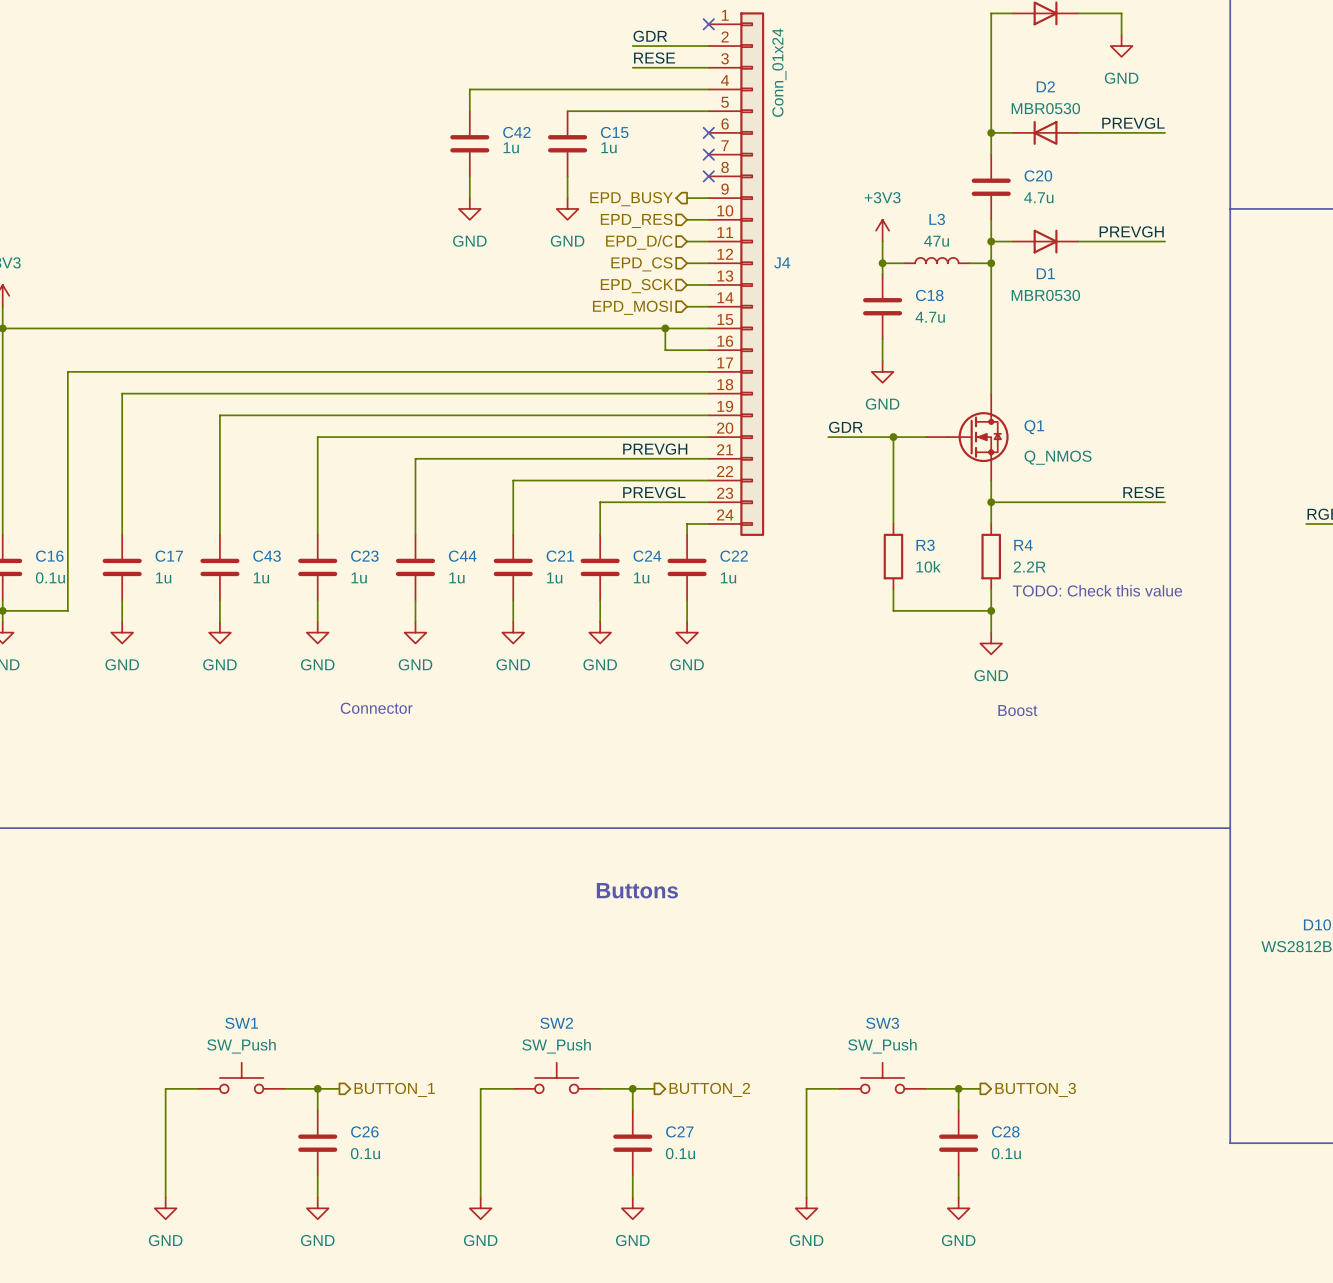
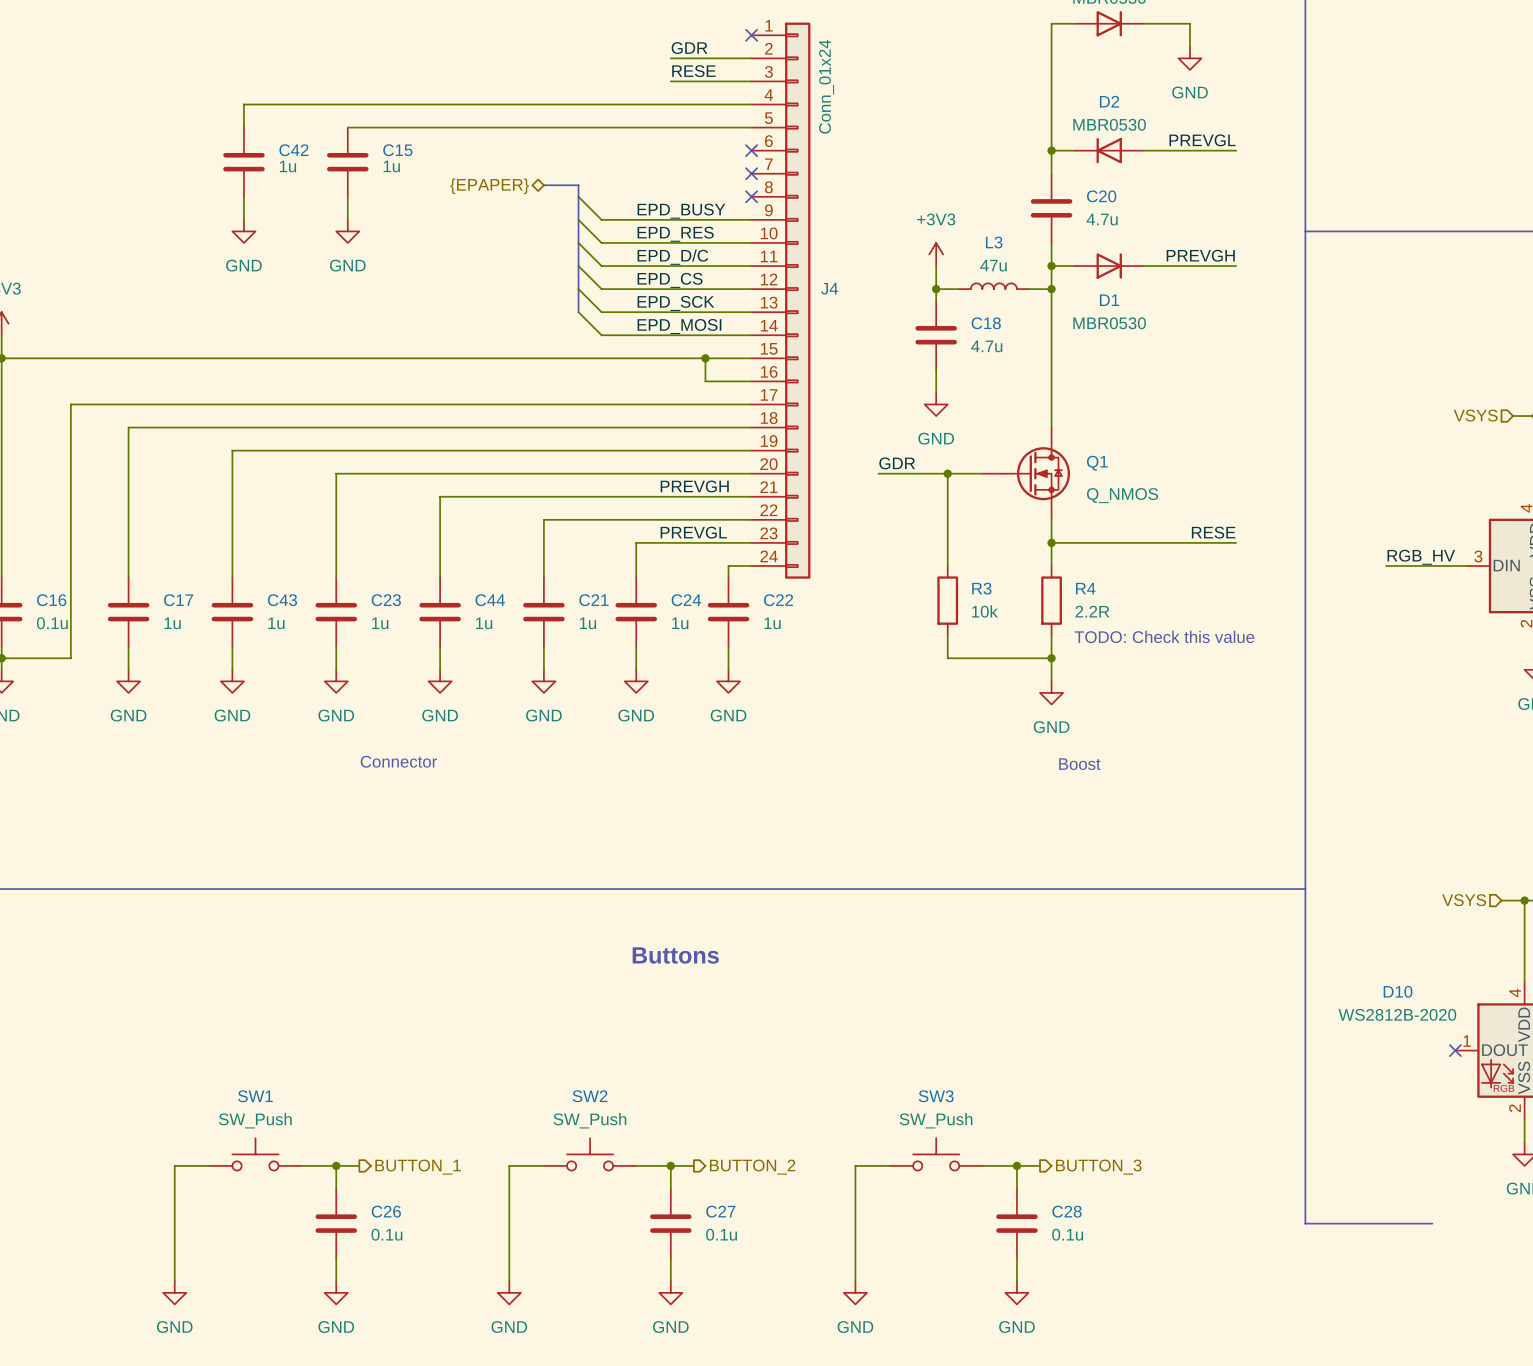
wire: (469, 89) (469, 111) -> (497, 104) (243, 104) (243, 127)
wire: none -> (347, 127) (601, 127)
C42 position: (469, 143) -> (243, 162)
C15 position: (567, 143) -> (347, 162)
bus: none -> (543, 185) (578, 185) (578, 312)
hierarchical label: none -> {EPAPER} (489, 186)
wire: none -> (243, 196) (243, 219)
wire: (469, 176) (469, 198) -> (347, 196) (347, 219)
wire: none -> (578, 196) (601, 219) (728, 219)
wire: (567, 176) (567, 198) -> none
label: none -> EPD_BUSY (681, 211)
wire: none -> (578, 219) (601, 242) (728, 242)
hierarchical label: EPD_BUSY (631, 199) -> none
power symbol: none -> GND (243, 231)
power symbol: none -> GND (347, 231)
power symbol: GND (469, 208) -> none
power symbol: GND (567, 208) -> none
label: none -> EPD_RES (675, 234)
wire: none -> (578, 242) (601, 266) (728, 266)
hierarchical label: EPD_RES (636, 220) -> none
label: none -> EPD_D/C (672, 257)
wire: none -> (578, 266) (601, 289) (728, 289)
hierarchical label: EPD_D/C (639, 242) -> none
label: none -> EPD_CS (670, 280)
wire: none -> (578, 289) (601, 312) (728, 312)
hierarchical label: EPD_CS (641, 264) -> none
label: none -> EPD_SCK (675, 303)
wire: none -> (578, 312) (601, 335) (728, 335)
hierarchical label: EPD_SCK (636, 286) -> none
label: none -> EPD_MOSI (679, 326)
hierarchical label: EPD_MOSI (632, 307) -> none

